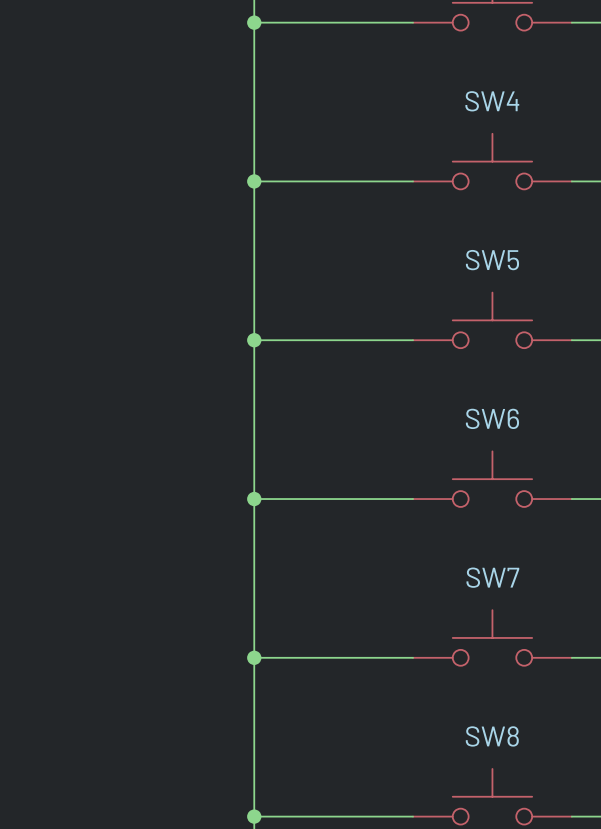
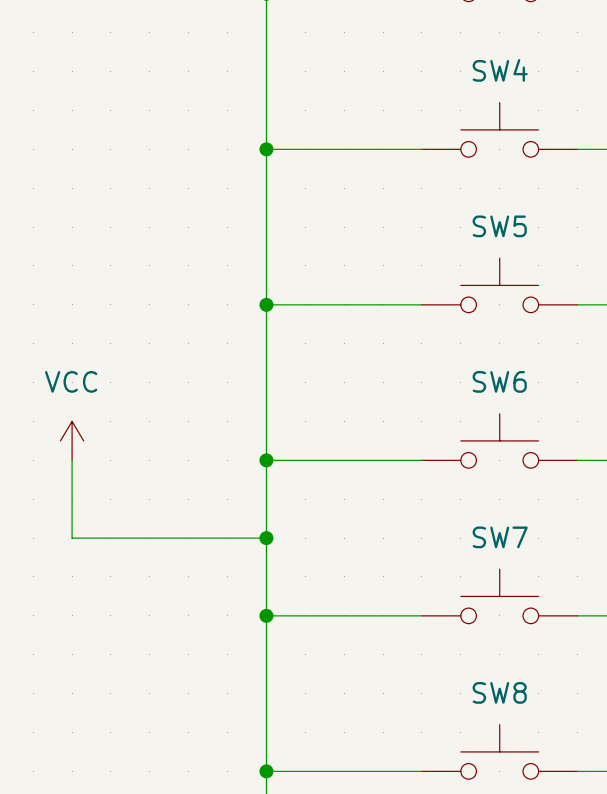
power symbol: none -> VCC (72, 440)
wire: none -> (72, 460) (72, 538) (266, 538)
junction: none -> (266, 538)

